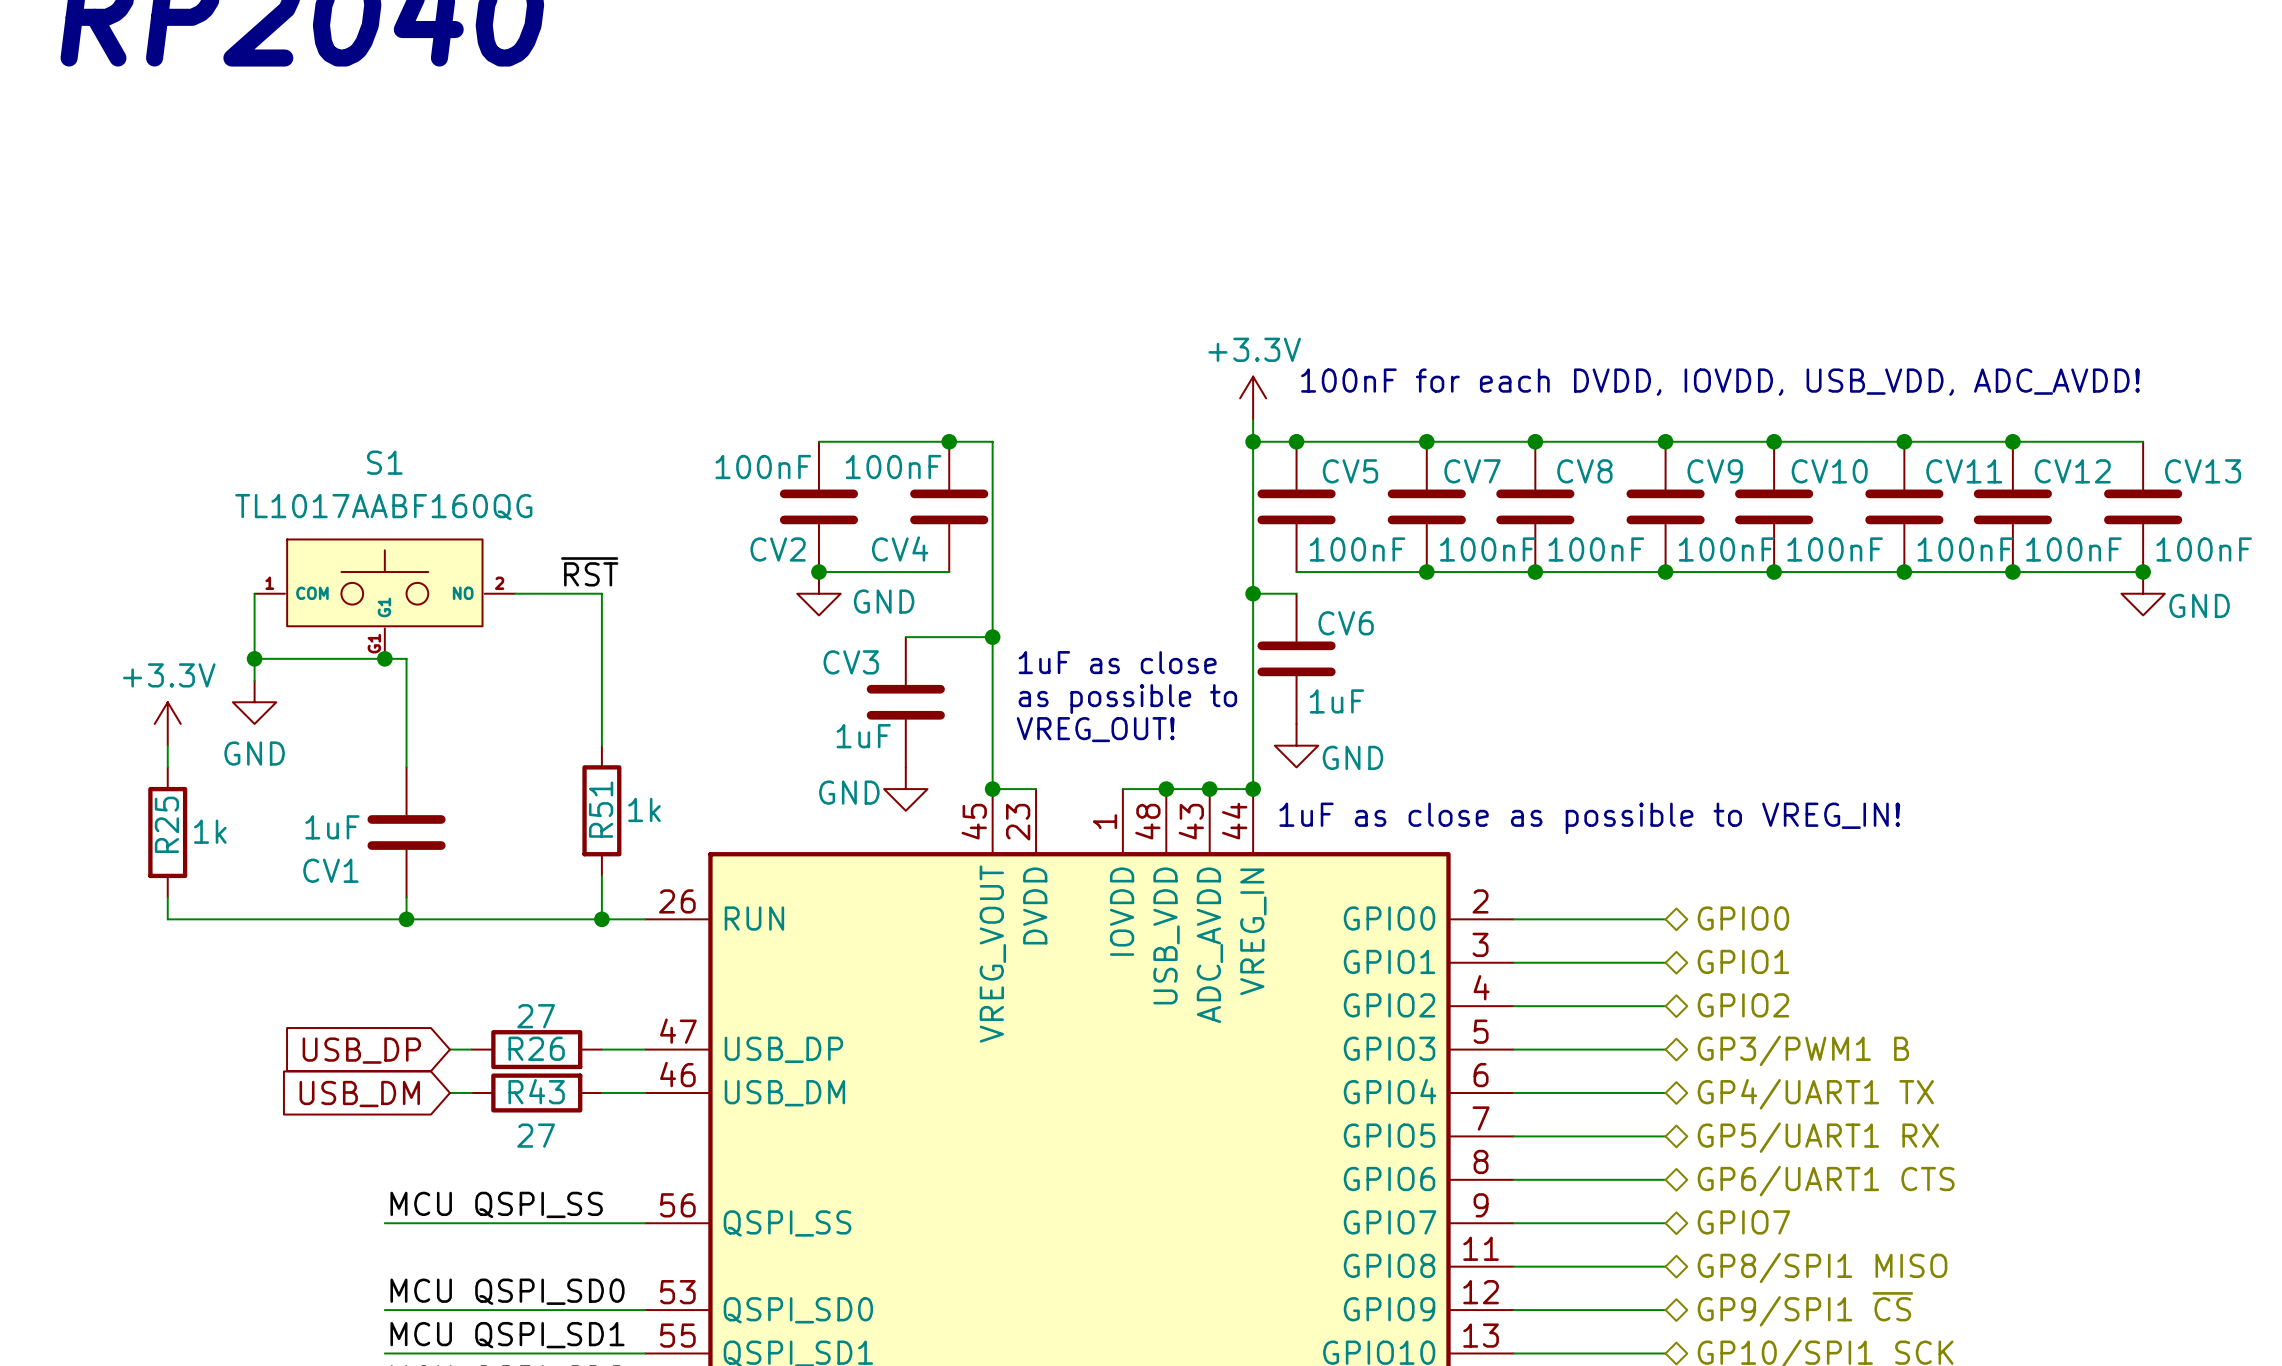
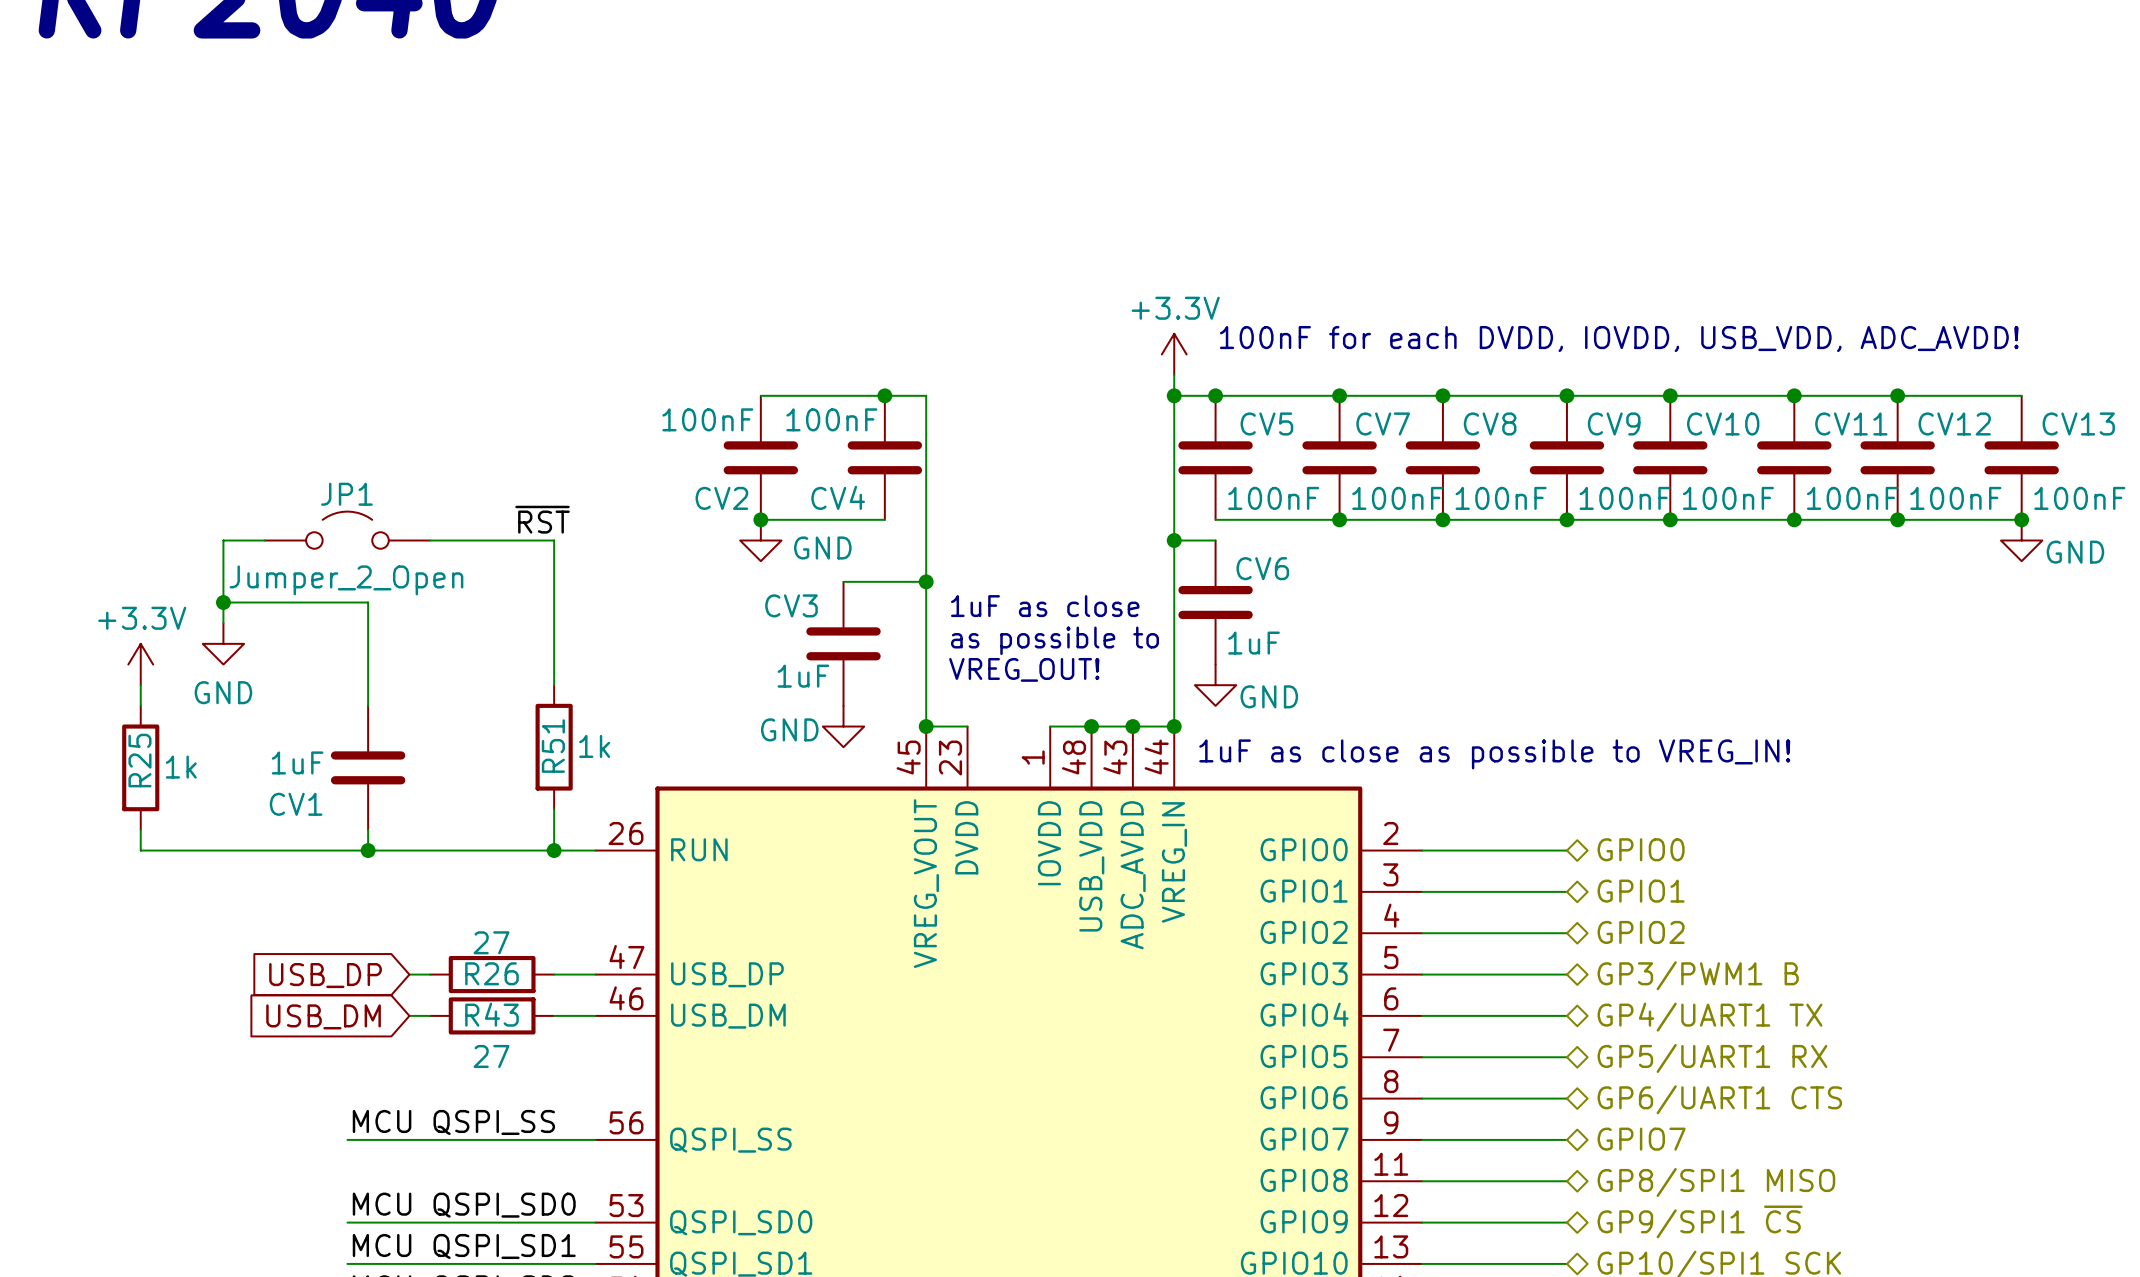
JP1: none -> Jumper_2_Open (347, 530)
S1: TL1017AABF160QG (384, 599) -> none
junction: (384, 658) -> none

